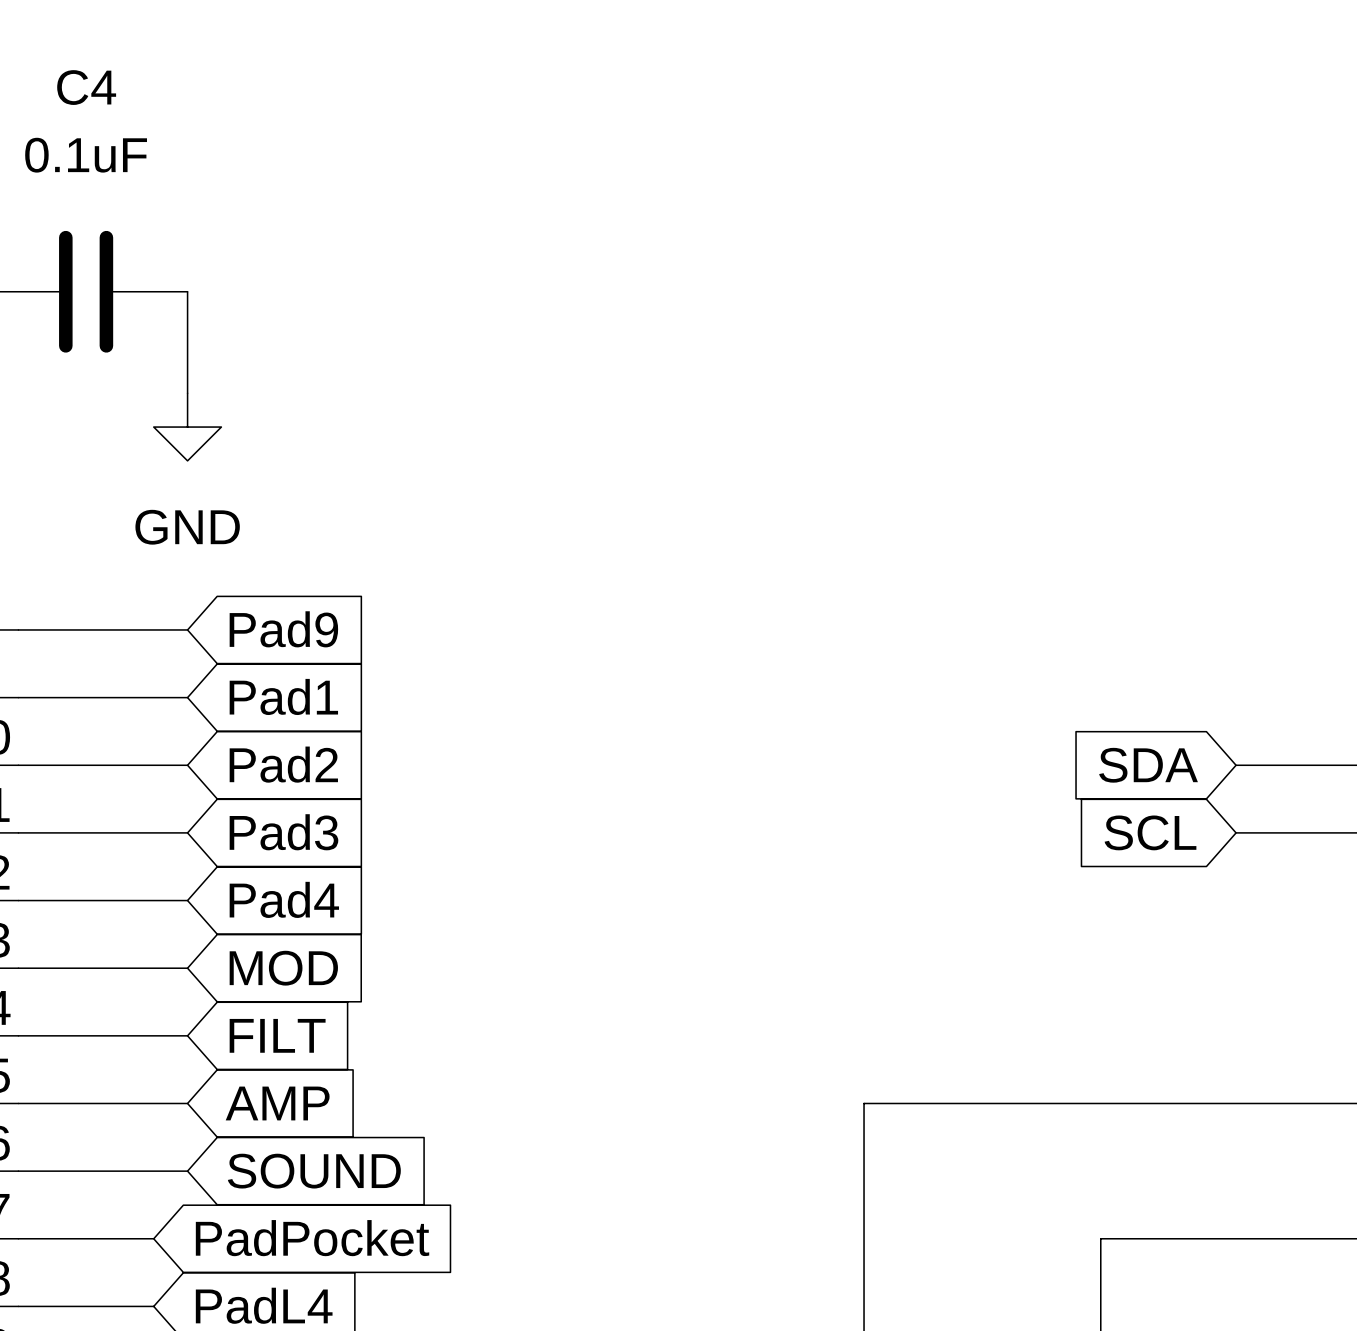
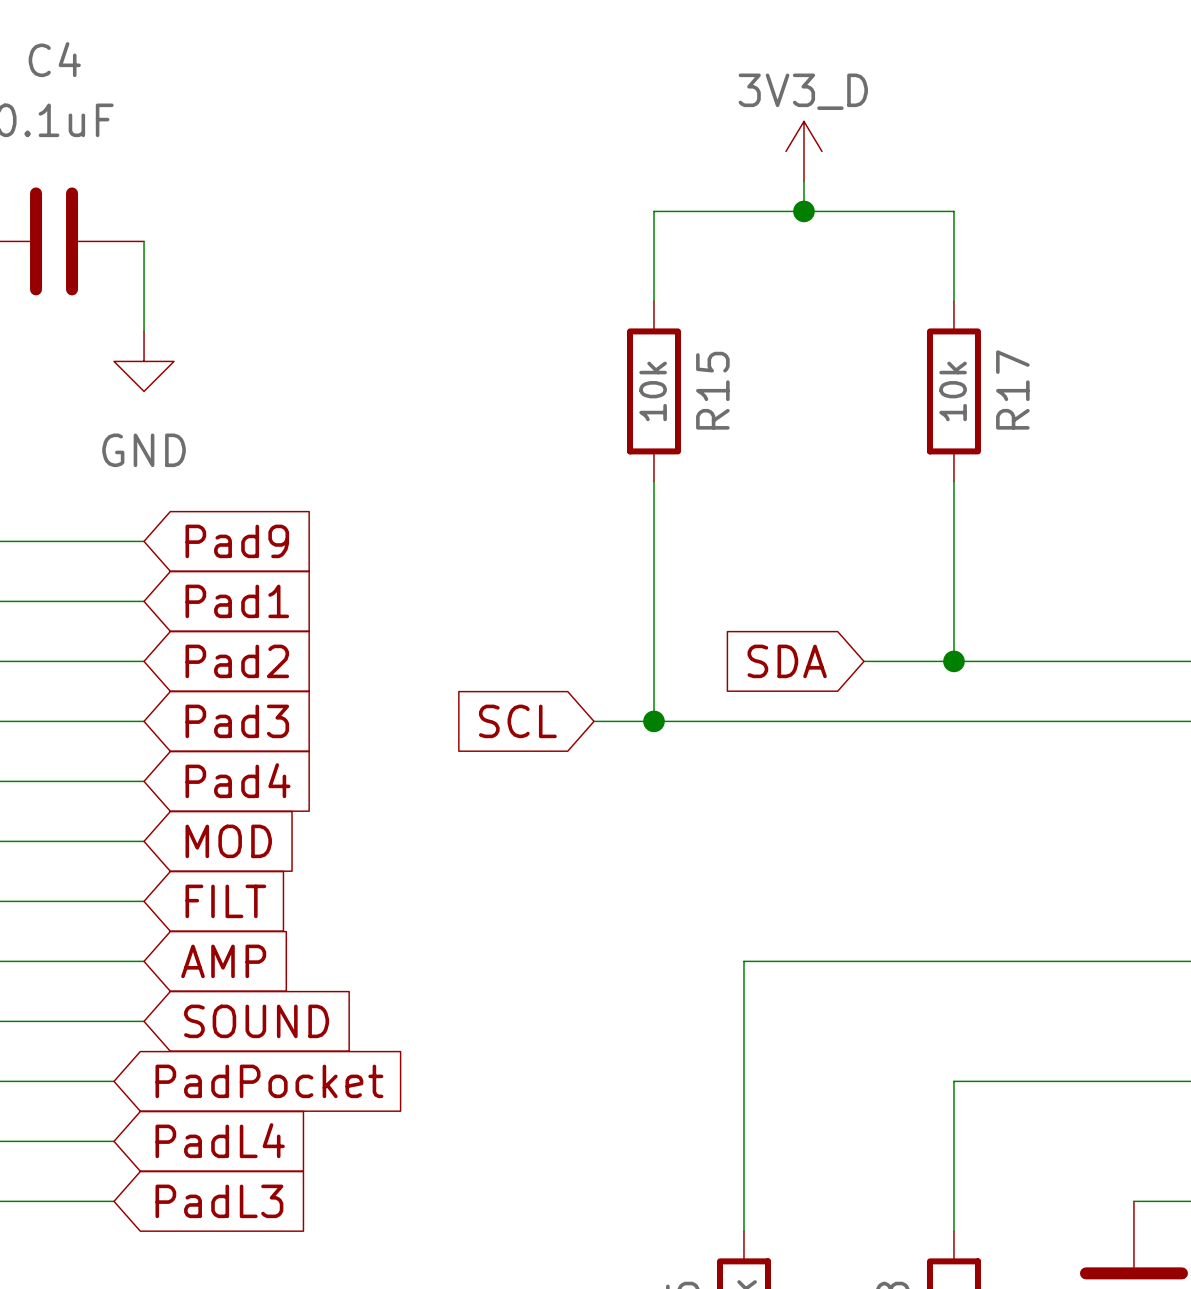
power symbol: none -> 3V3_D (803, 151)
wire: none -> (803, 181) (803, 211)
junction: none -> (803, 211)
wire: none -> (653, 301) (653, 211) (953, 211) (953, 301)
R15: none -> 10k (653, 391)
R17: none -> 10k (953, 391)
wire: none -> (653, 481) (653, 721)
wire: none -> (953, 481) (953, 661)
wire: none -> (863, 661) (1073, 661)
junction: none -> (953, 661)
global label position: SDA (1148, 765) -> SDA (787, 661)
wire: none -> (593, 721) (1073, 721)
junction: none -> (653, 721)
global label position: SCL (1150, 832) -> SCL (517, 721)

